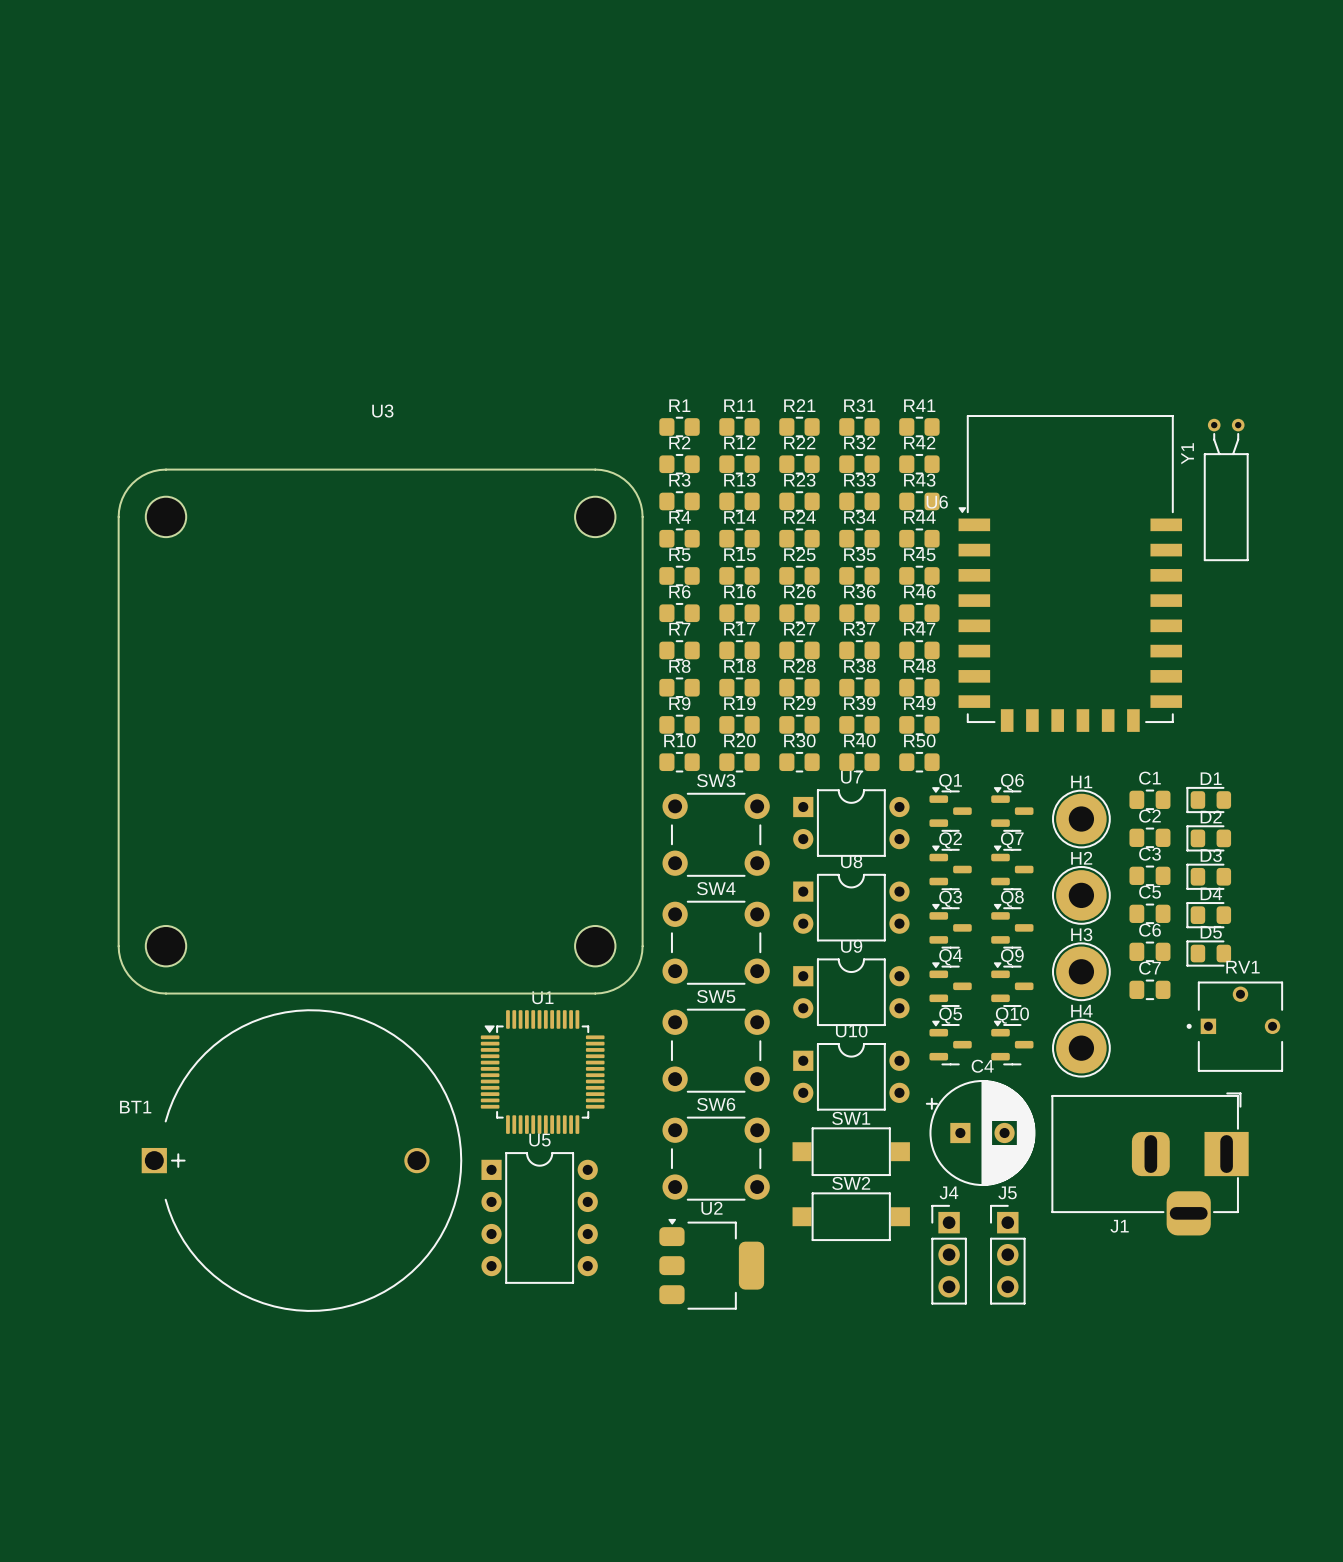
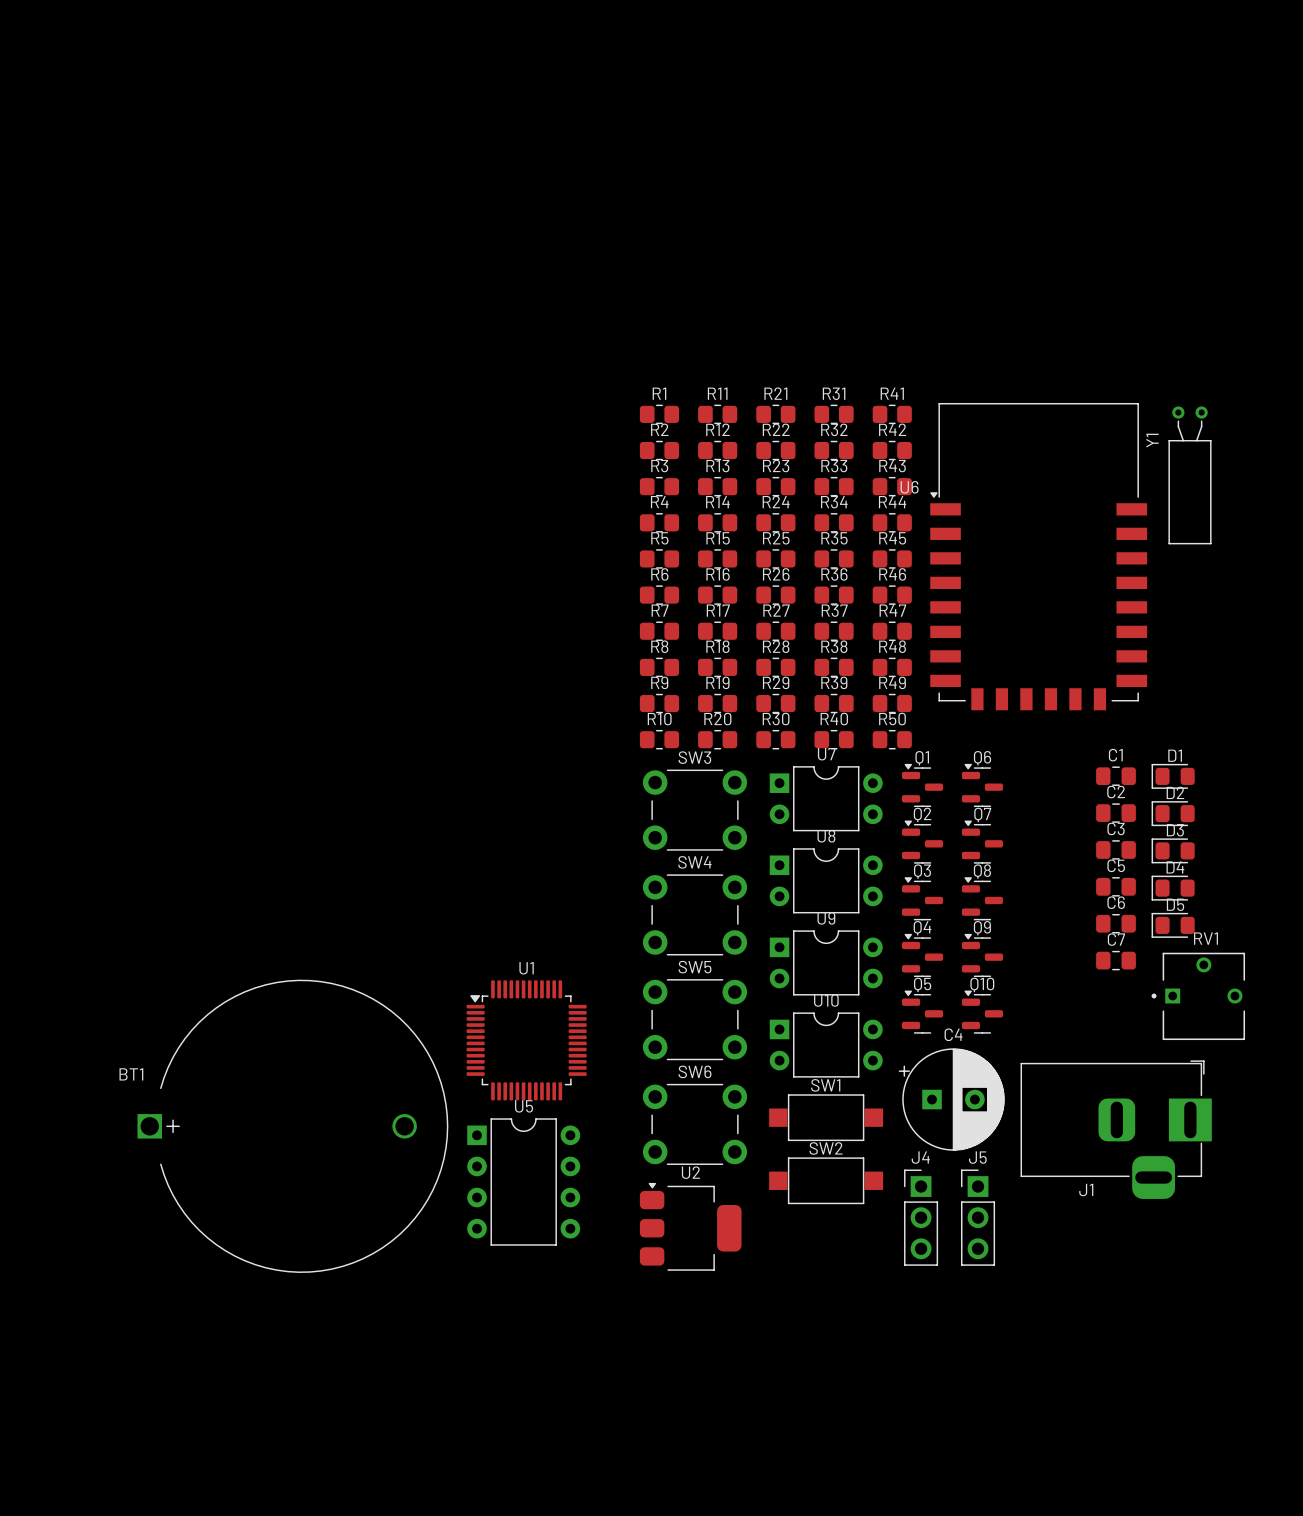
U3: (380, 731) -> none
H1: (1081, 819) -> none
H2: (1081, 895) -> none
H3: (1081, 971) -> none
H4: (1081, 1048) -> none

